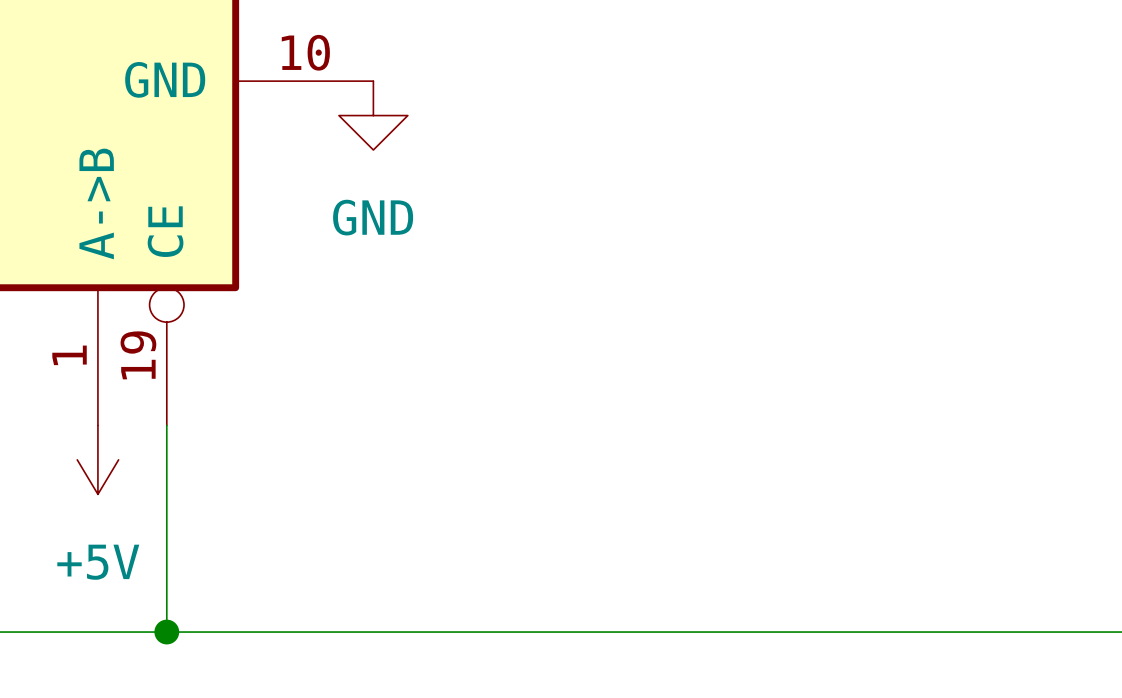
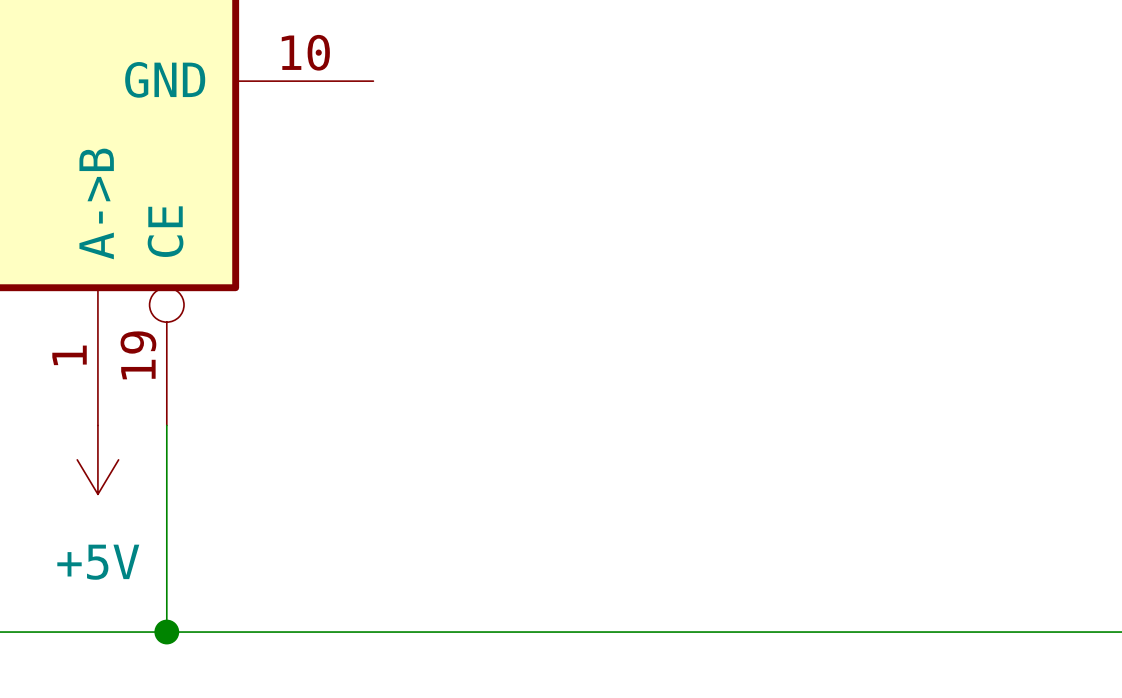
power symbol: GND (373, 115) -> none

